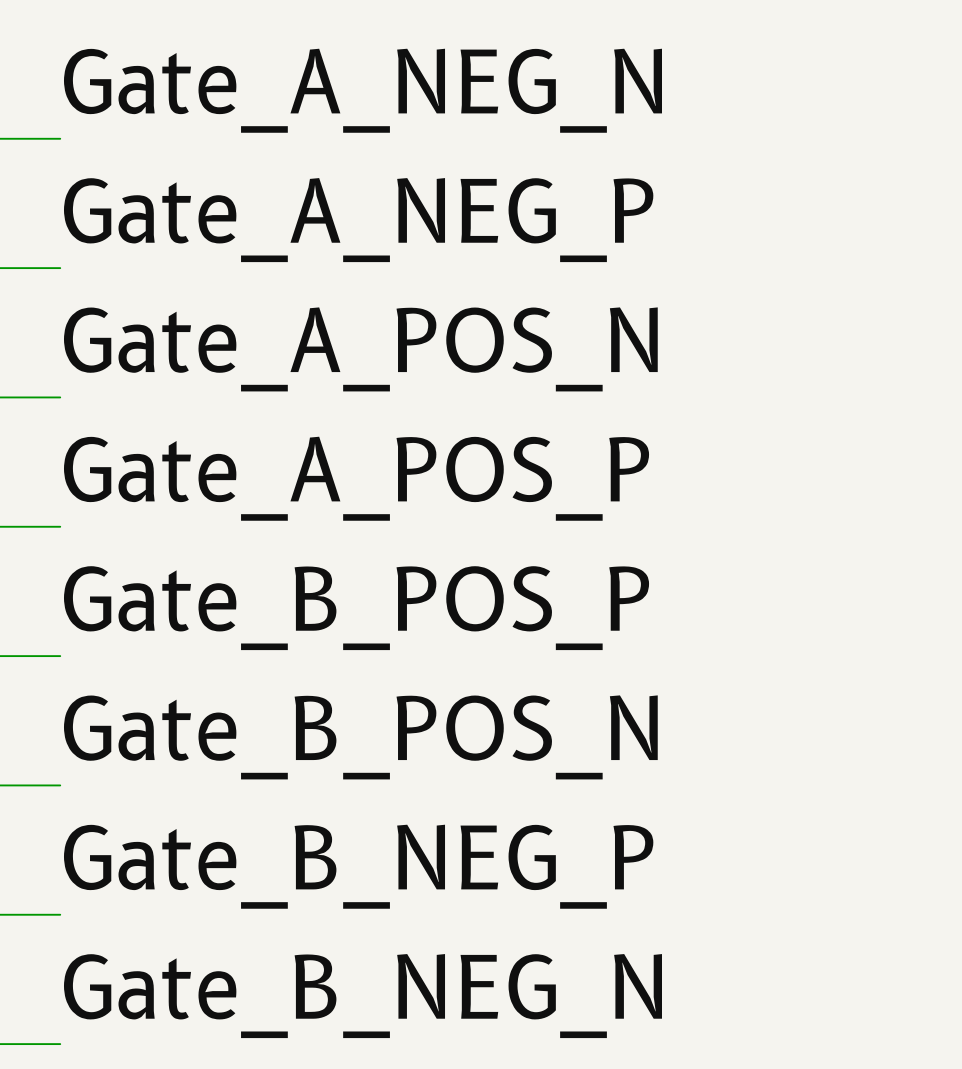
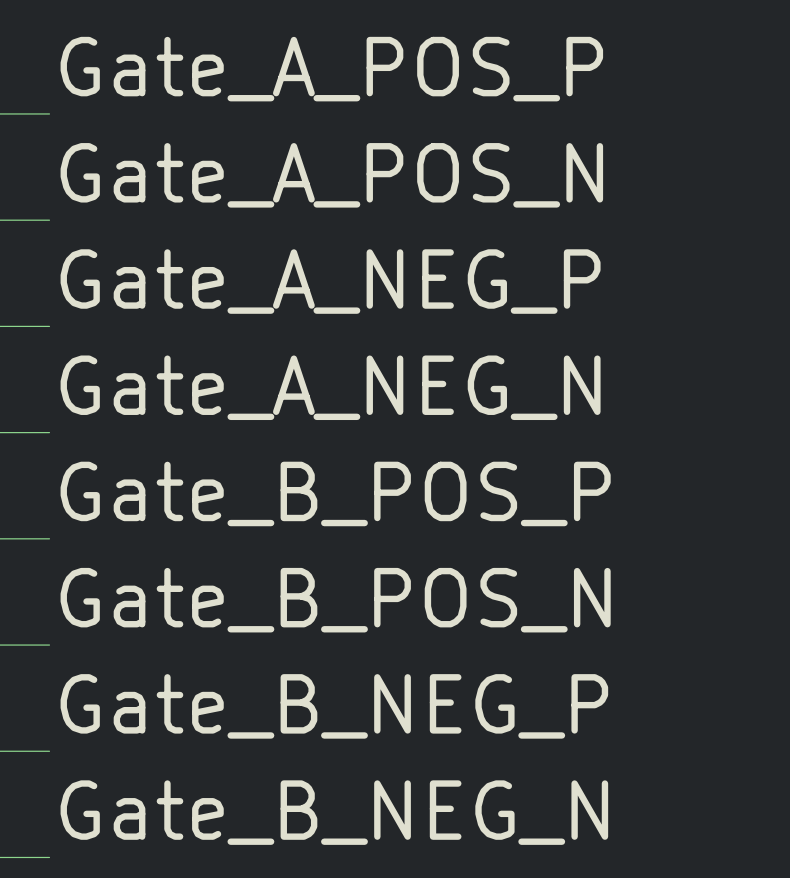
label: Gate_A_NEG_N (362, 90) -> Gate_A_POS_P (331, 69)
label: Gate_A_NEG_P (358, 220) -> Gate_A_POS_N (331, 175)
label: Gate_A_POS_N (360, 349) -> Gate_A_NEG_P (330, 281)
label: Gate_A_POS_P (356, 478) -> Gate_A_NEG_N (330, 387)

